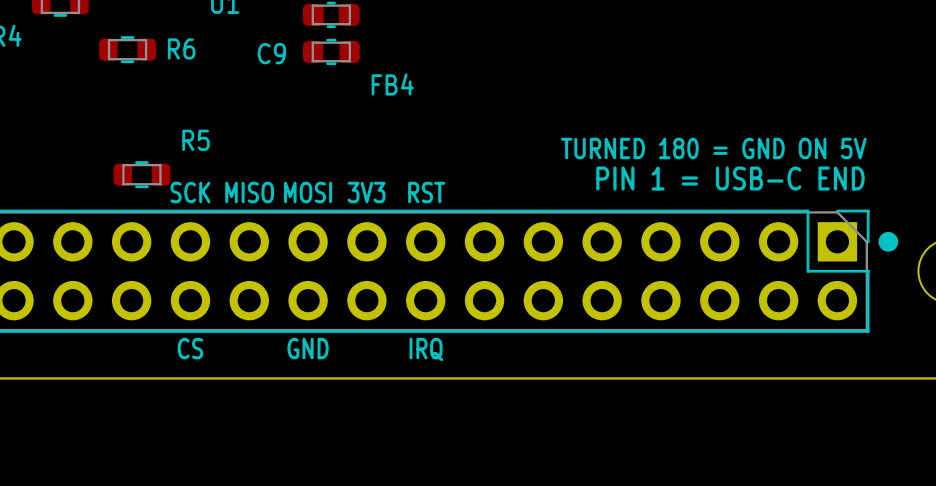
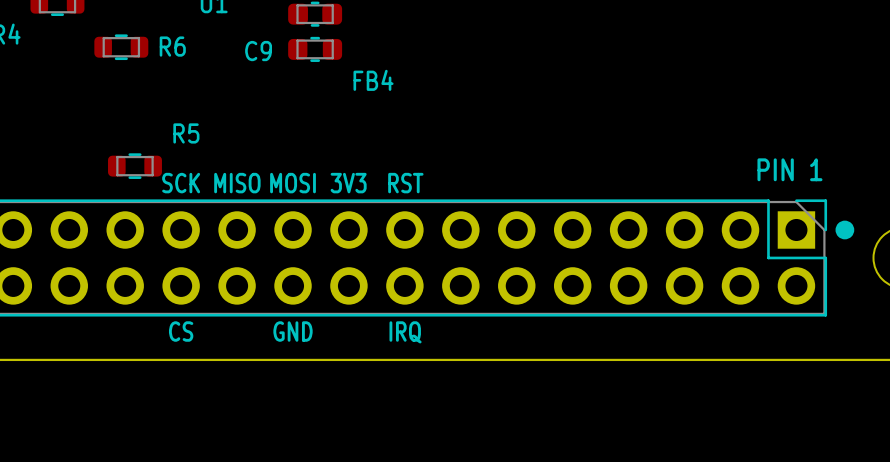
text: TURNED 180 = GND ON 5V (713, 148) -> none
text: PIN 1 = USB-C END (730, 178) -> PIN 1 (789, 169)

